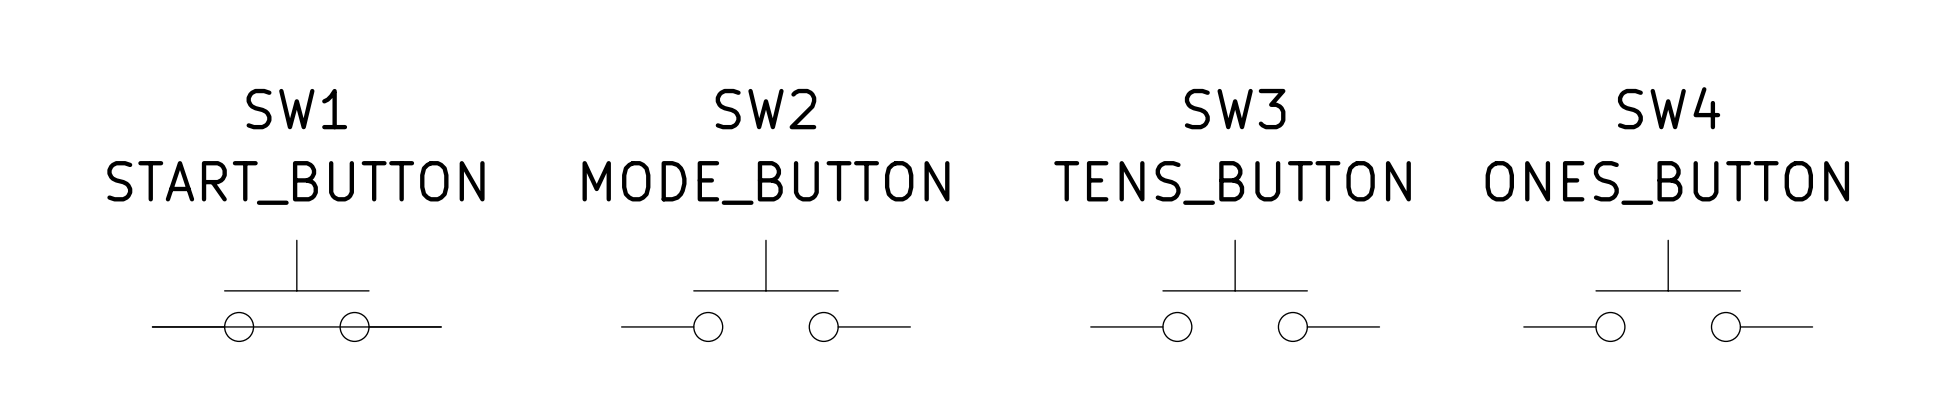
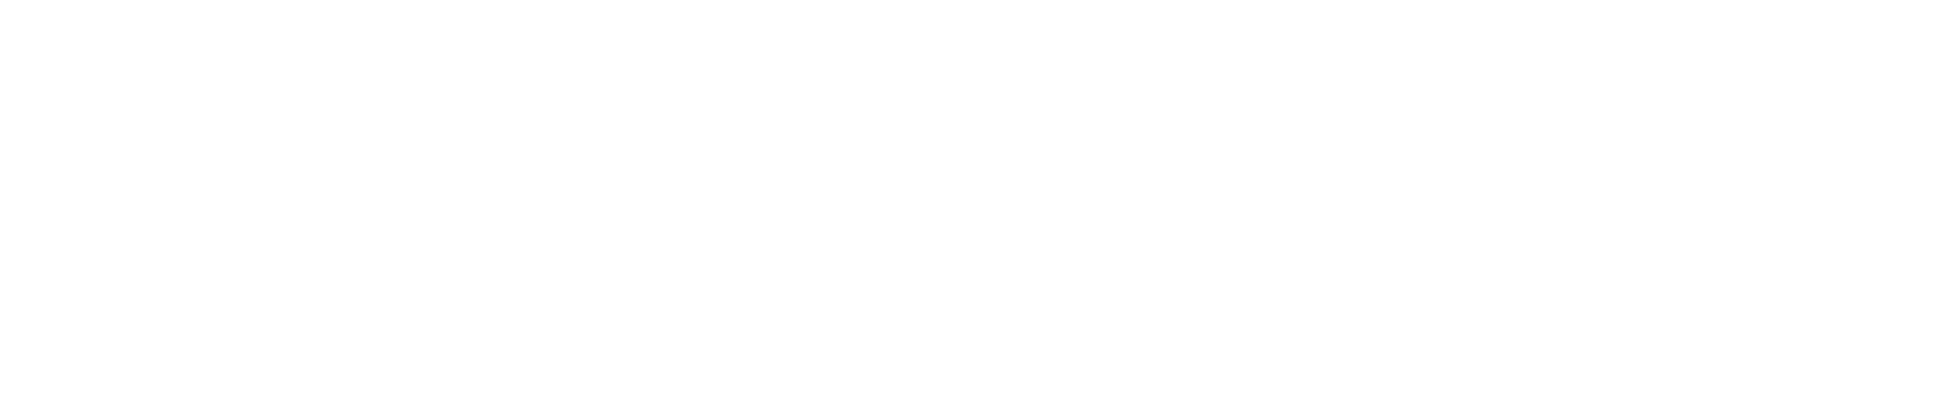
SW1: START_BUTTON (296, 290) -> none
SW2: MODE_BUTTON (765, 290) -> none
SW3: TENS_BUTTON (1235, 290) -> none
SW4: ONES_BUTTON (1668, 290) -> none
wire: (152, 326) (441, 326) -> none

